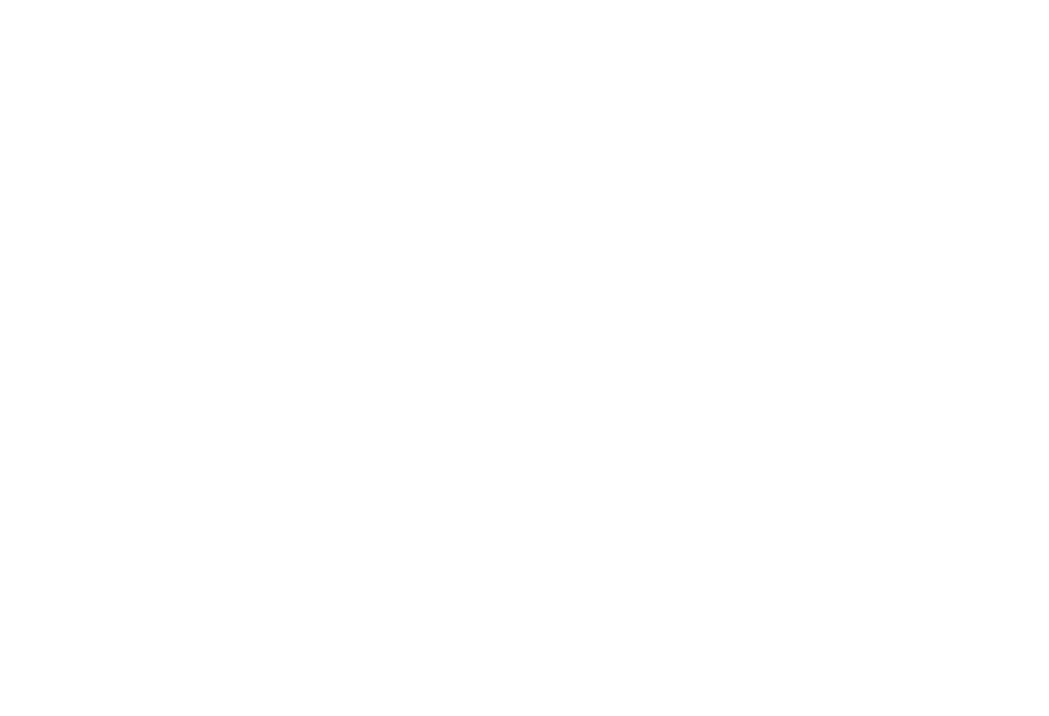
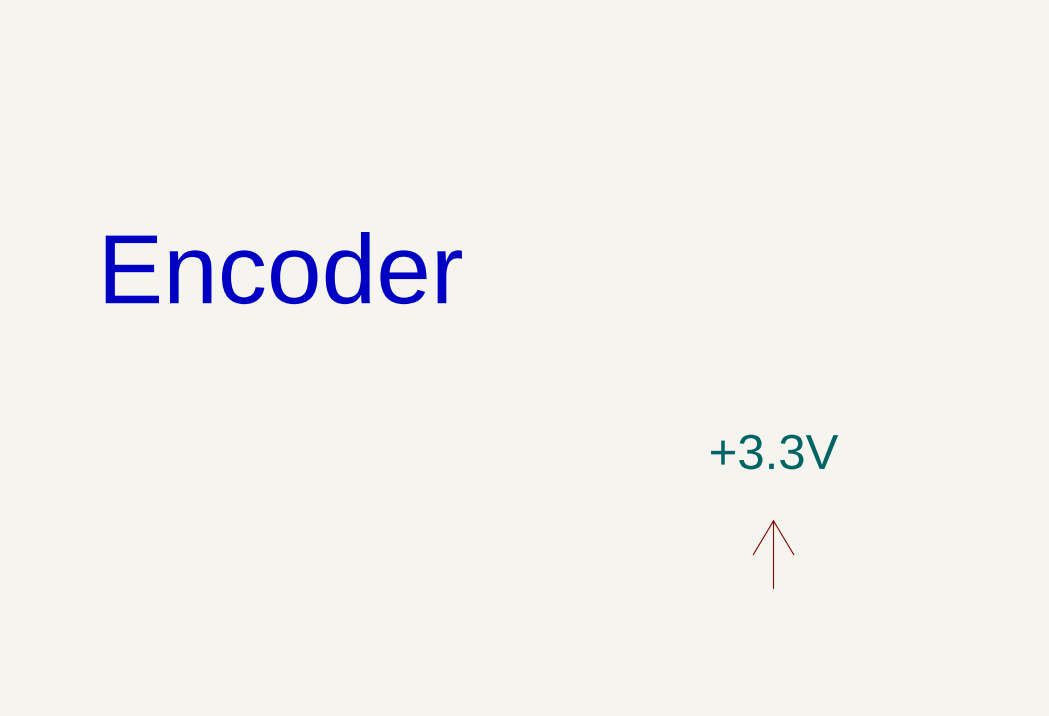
text: none -> Encoder (283, 268)
power symbol: none -> +3.3V (773, 554)

